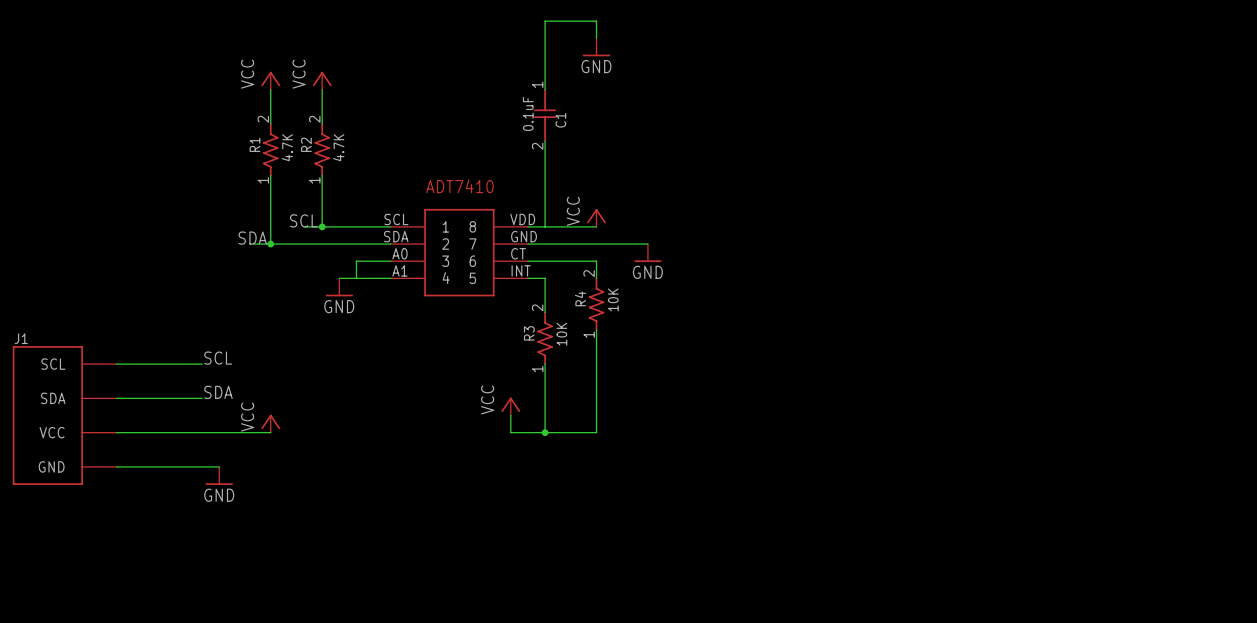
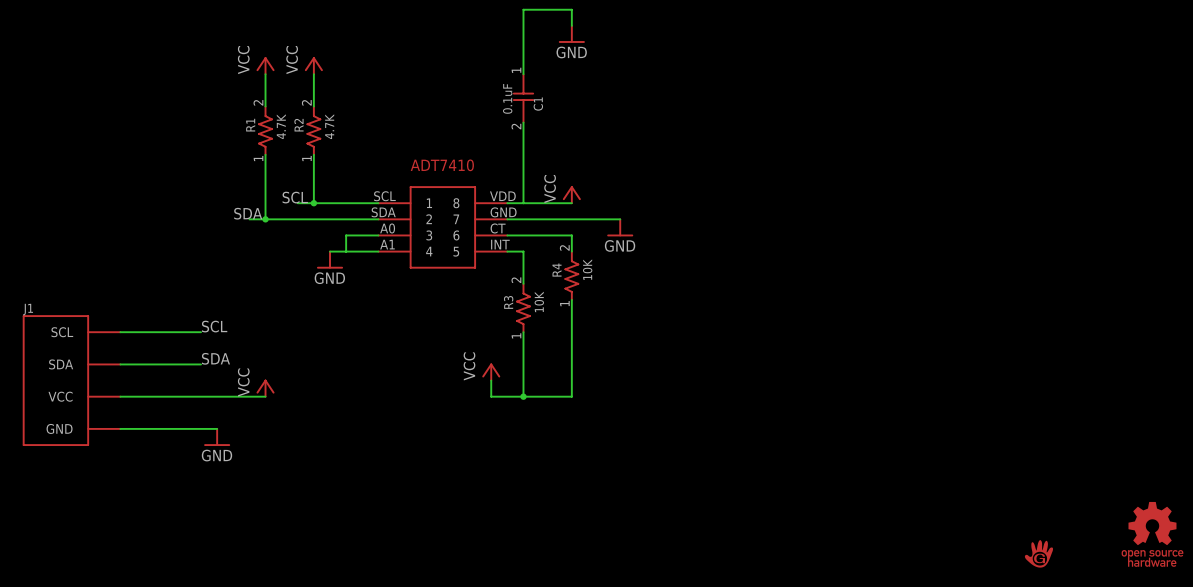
part: none -> (1152, 534)
part: none -> (1038, 553)

